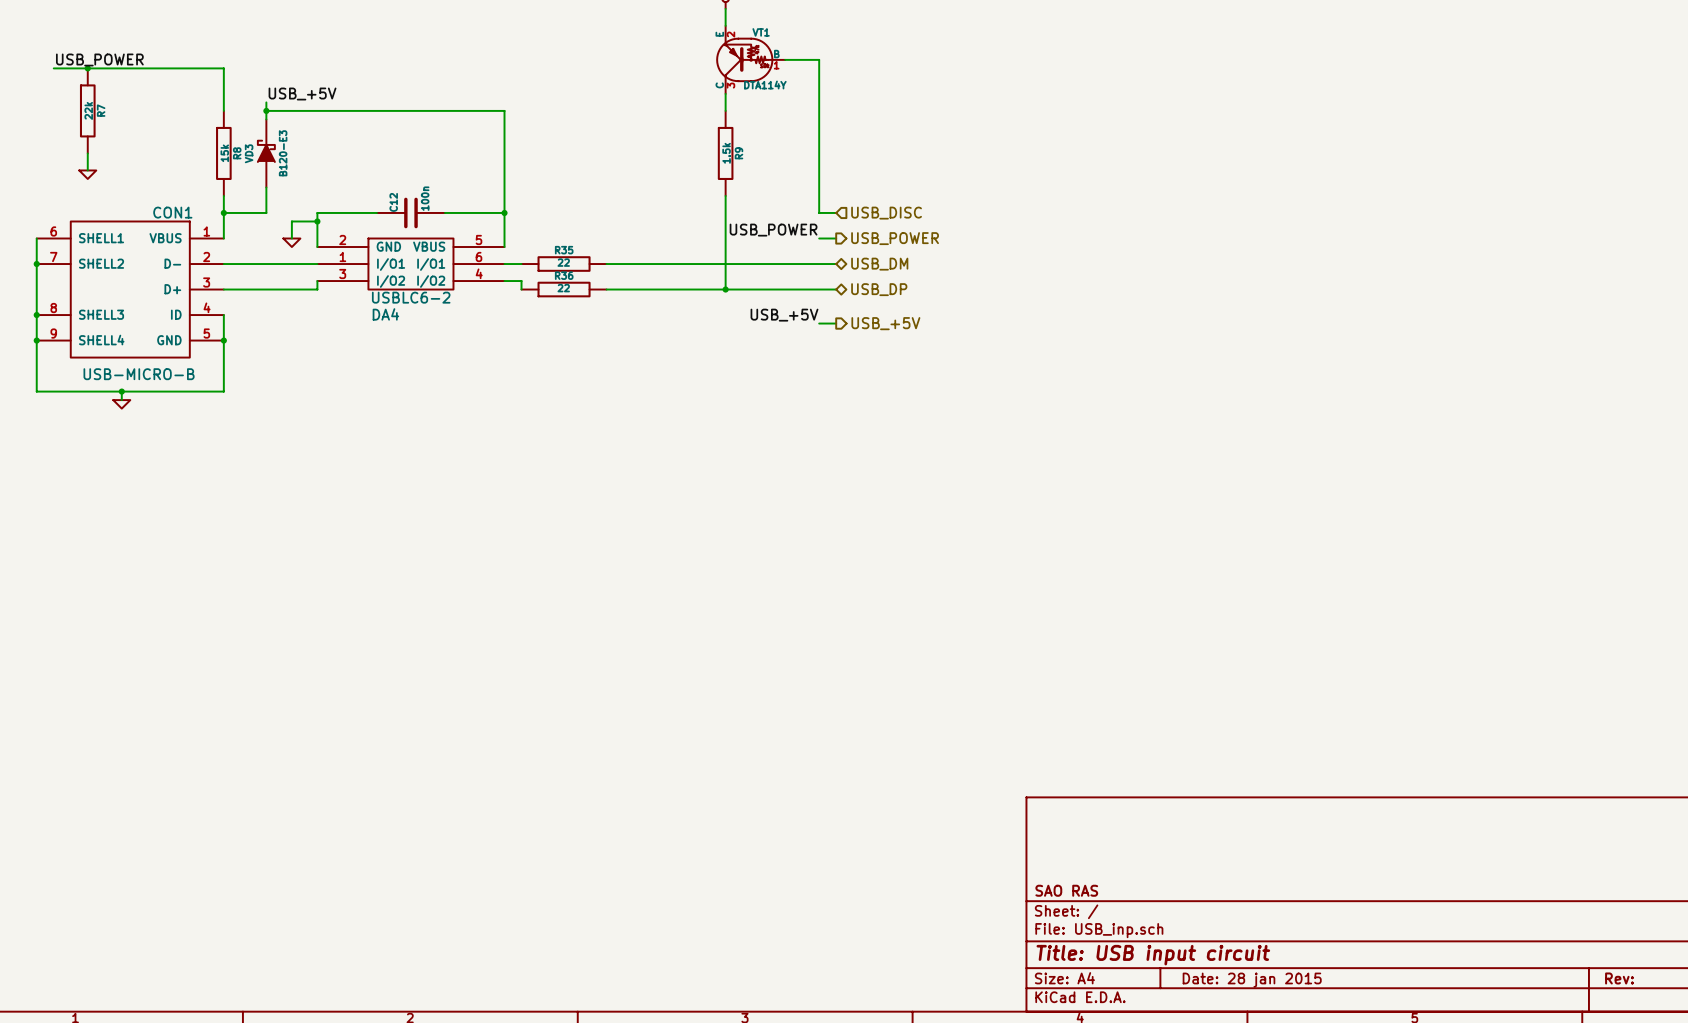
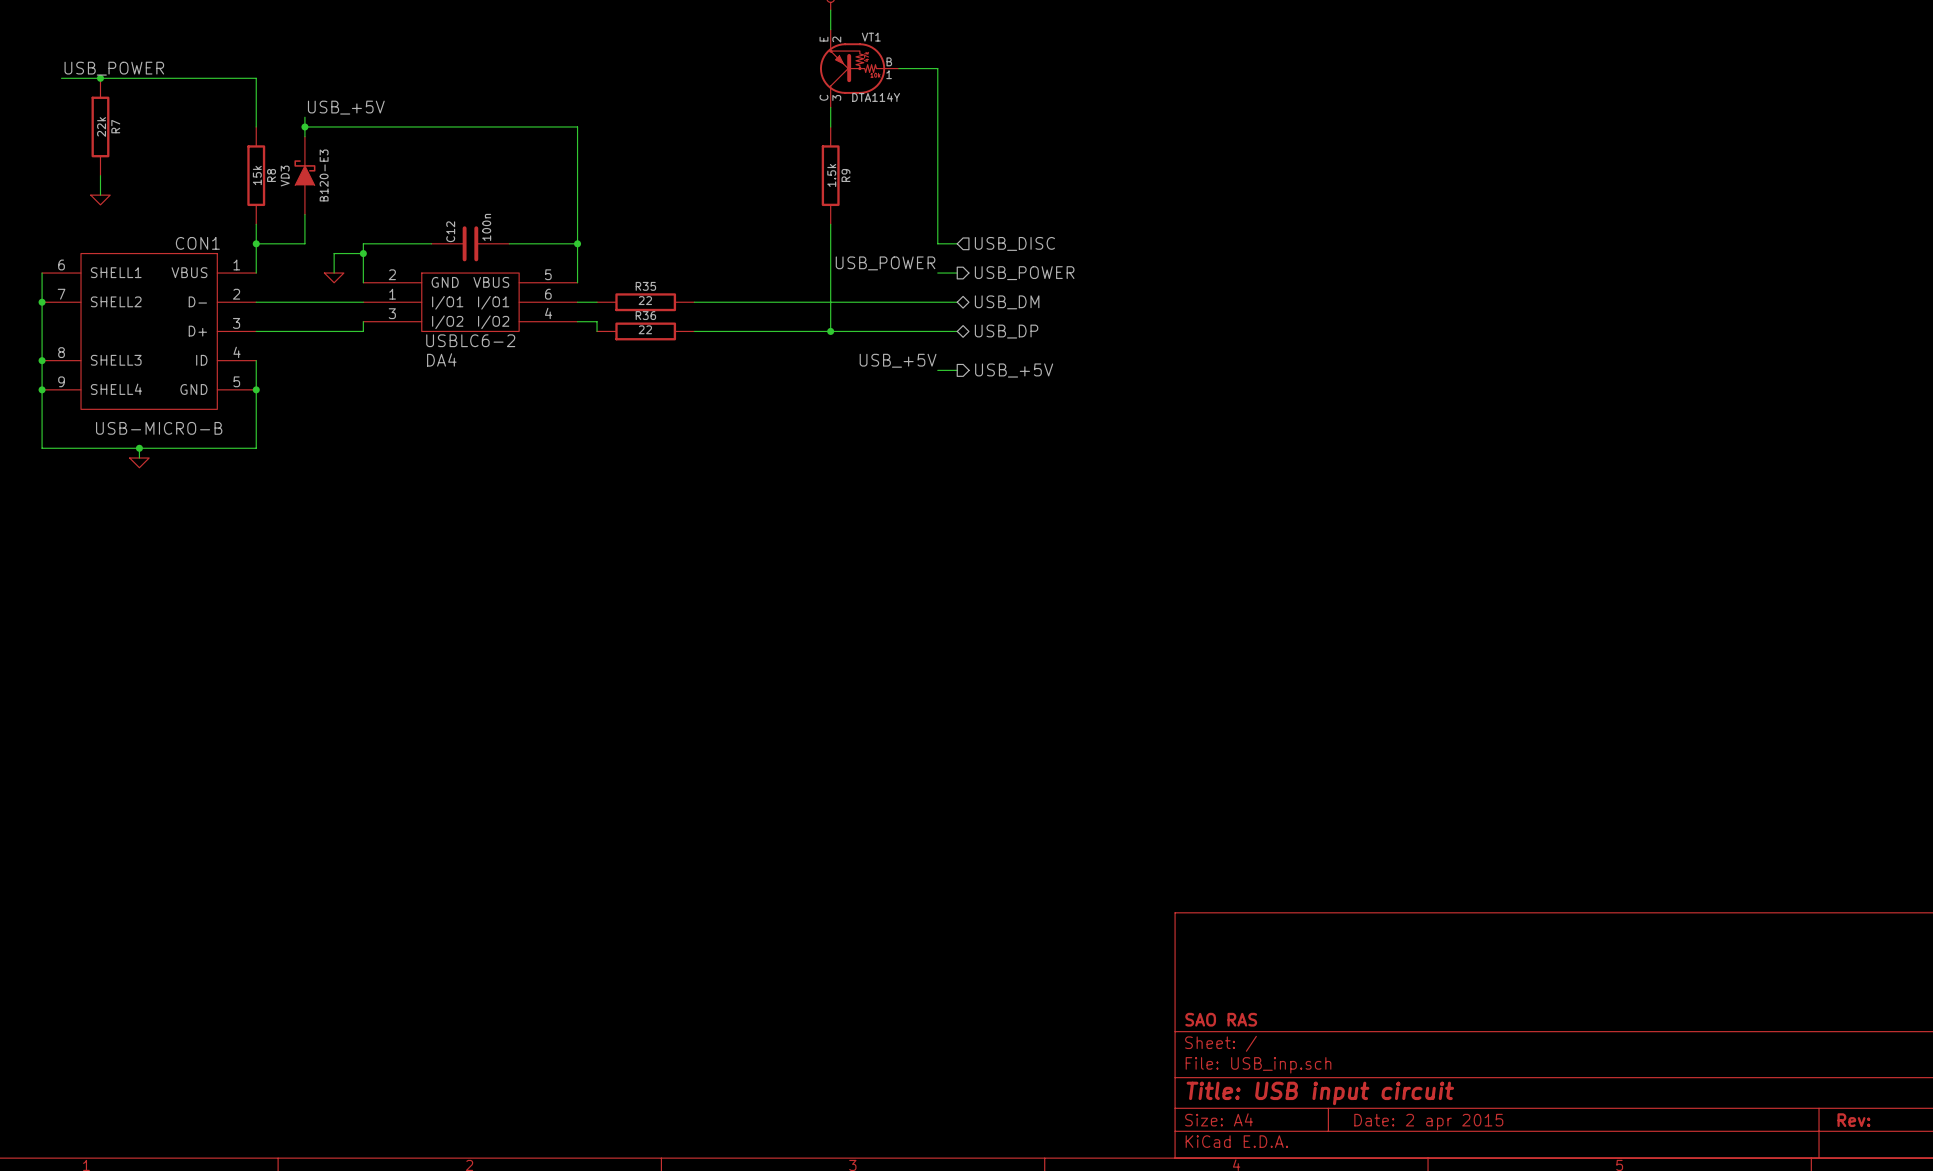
title block: Date: 28 jan 2015 (1252, 980) -> Date: 2 apr 2015 (1428, 1122)

